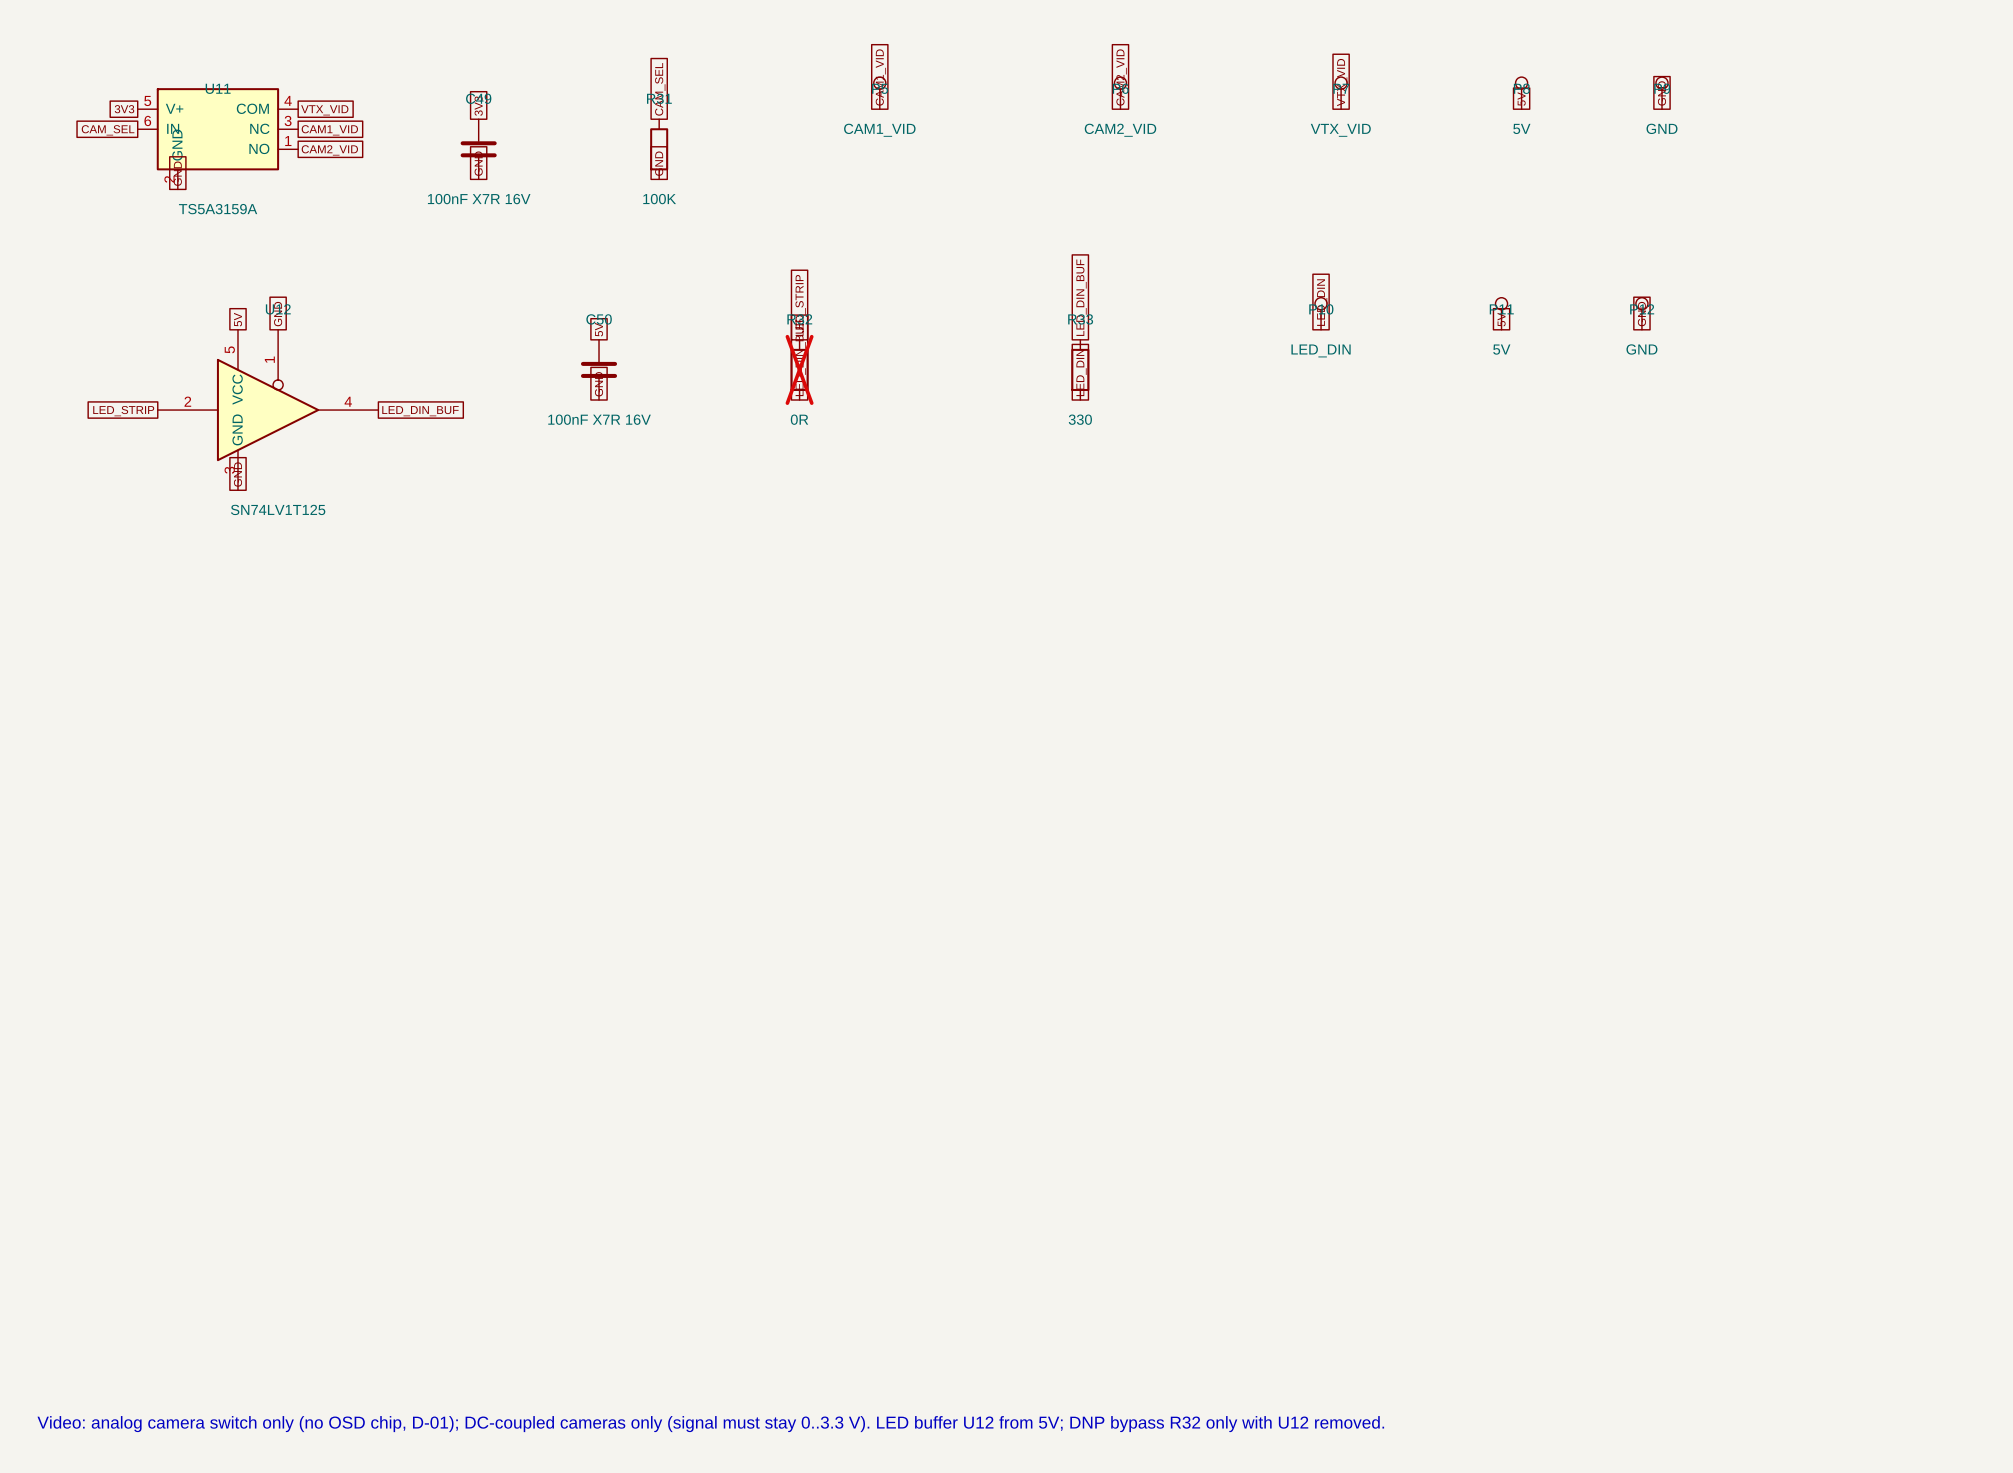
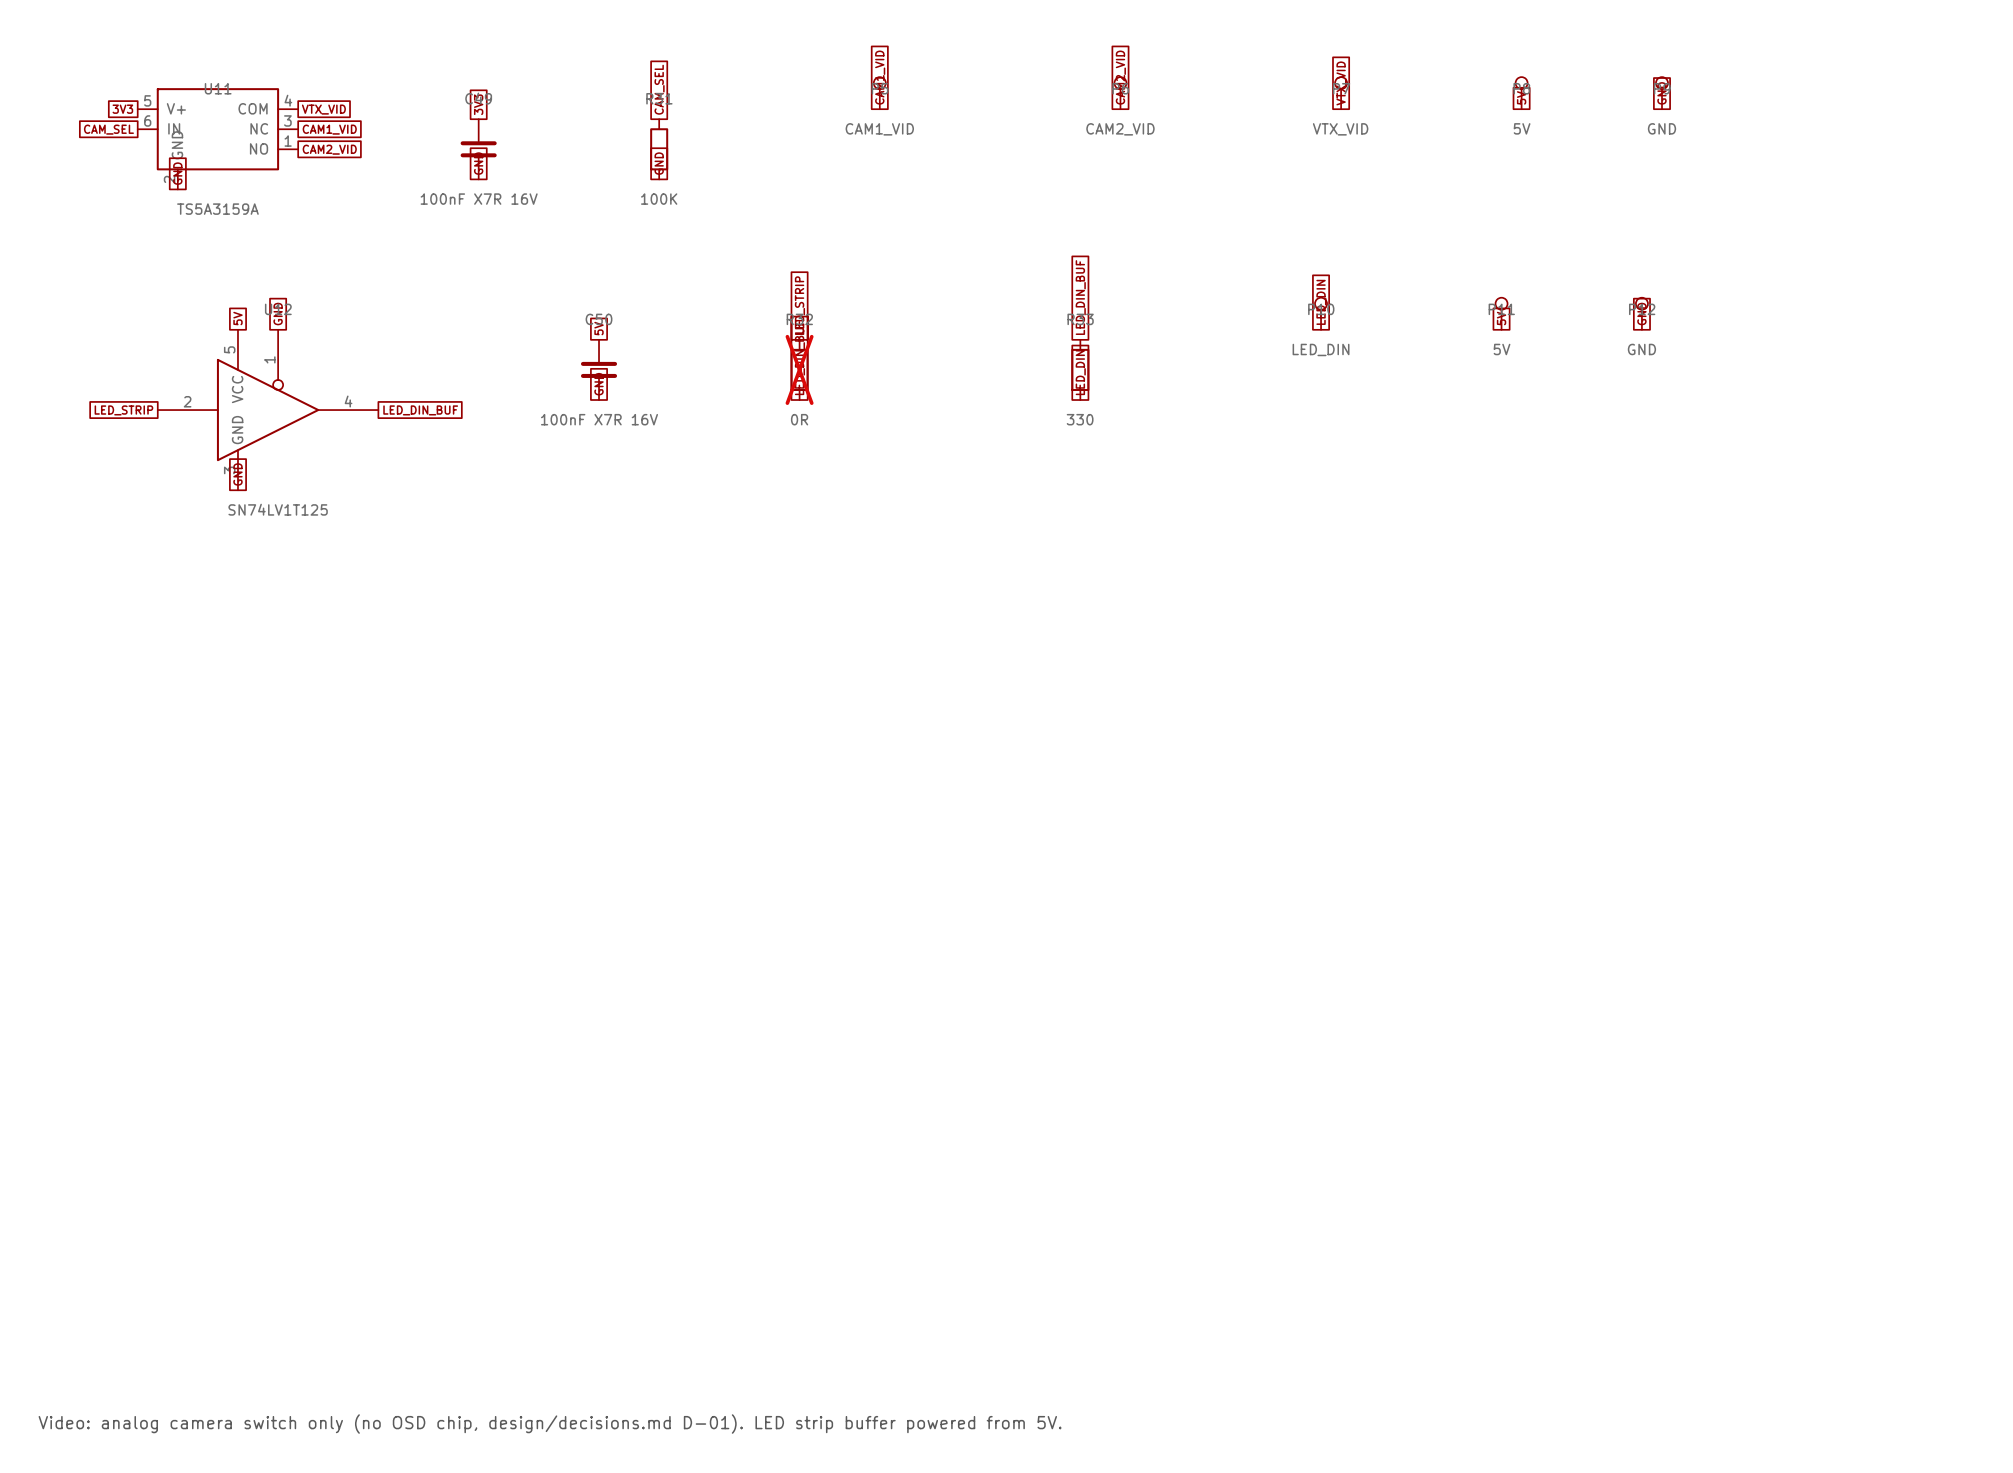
text: Video: analog camera switch only (no OSD chip, D-01); DC-coupled cameras only (signal must stay 0..3.3 V). LED buffer U12 from 5V; DNP bypass R32 only with U12 removed. (710, 1424) -> Video: analog camera switch only (no OSD chip, design/decisions.md D-01). LED strip buffer powered from 5V. (550, 1424)

